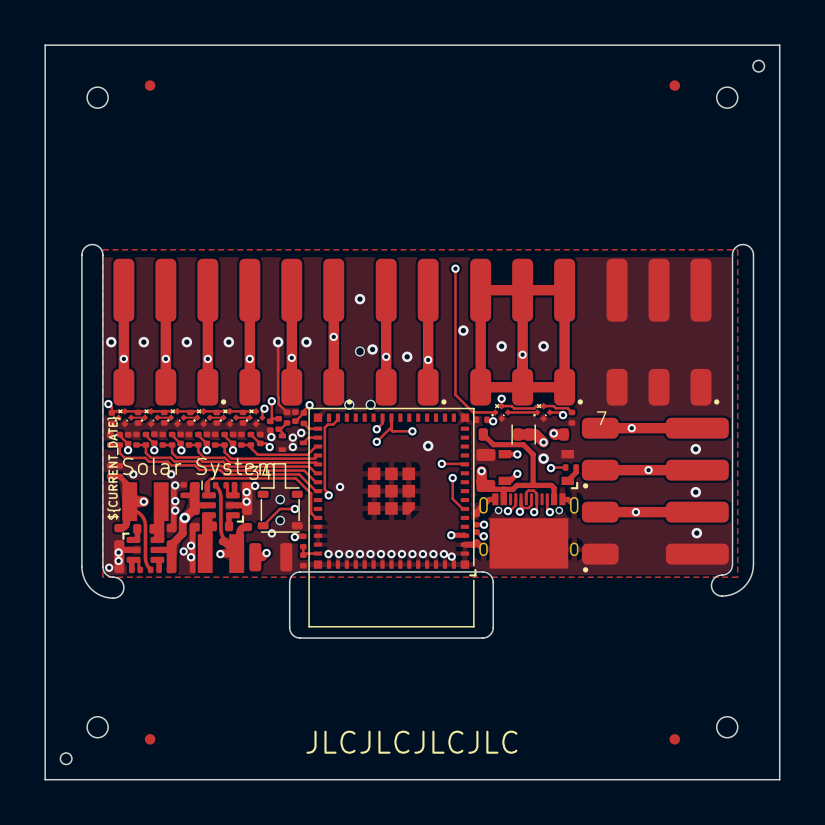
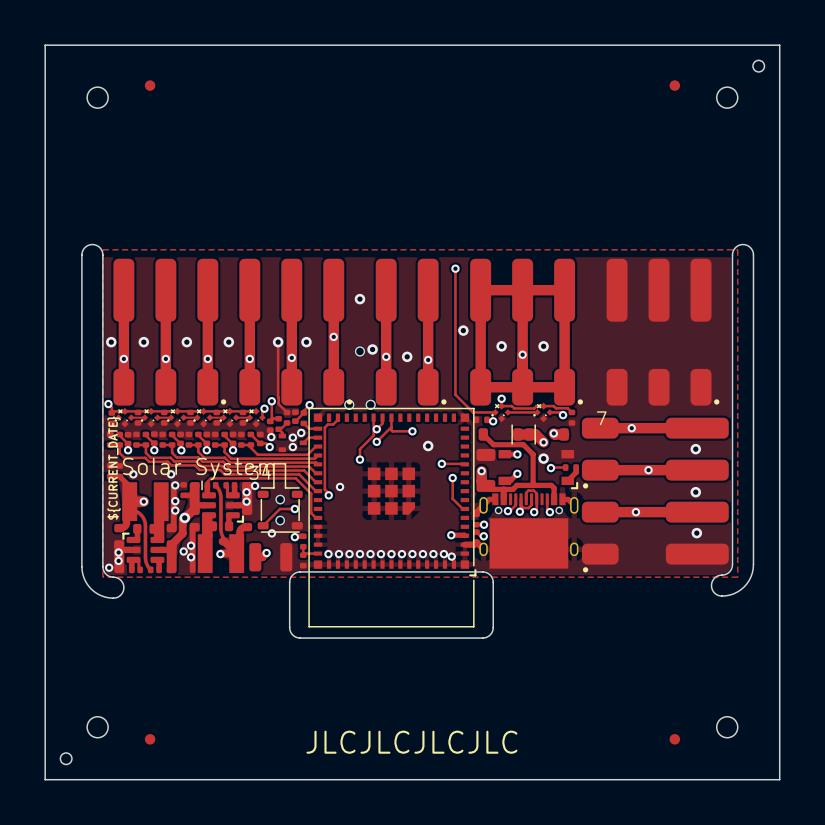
track: none -> (373, 417) (373, 435) (359, 449) (359, 459)
via: none -> (359, 459)

